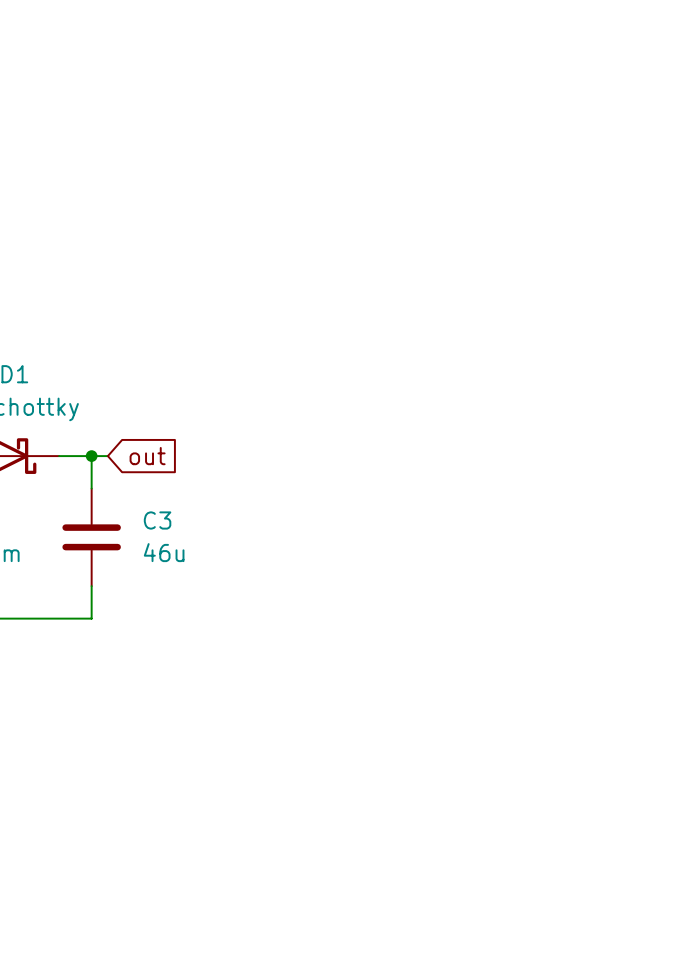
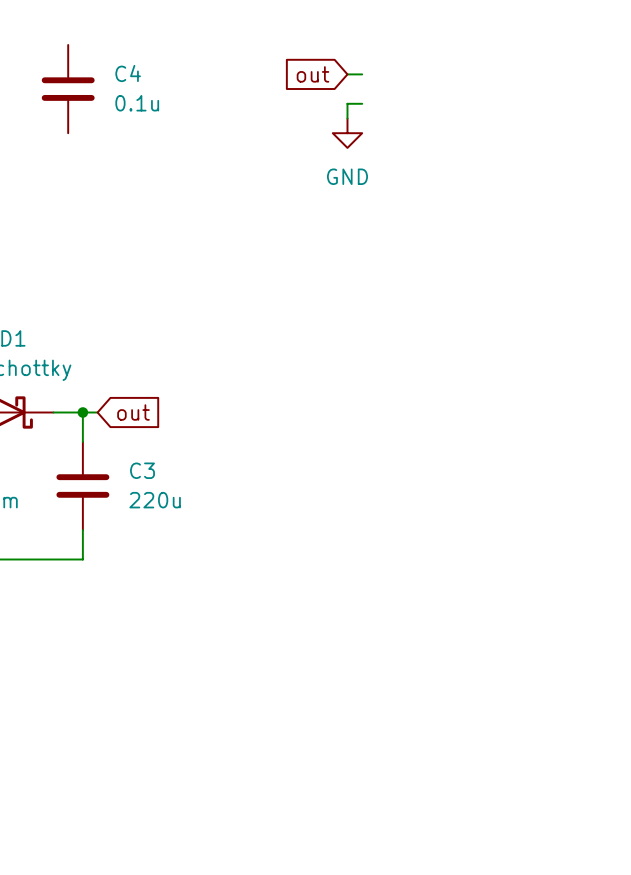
global label: none -> out (312, 74)
wire: none -> (347, 74) (362, 74)
C4: none -> 0.1u (68, 89)
wire: none -> (362, 103) (347, 103) (347, 118)
power symbol: none -> GND (347, 133)
C3 value: 46u (164, 552) -> 220u (155, 500)

